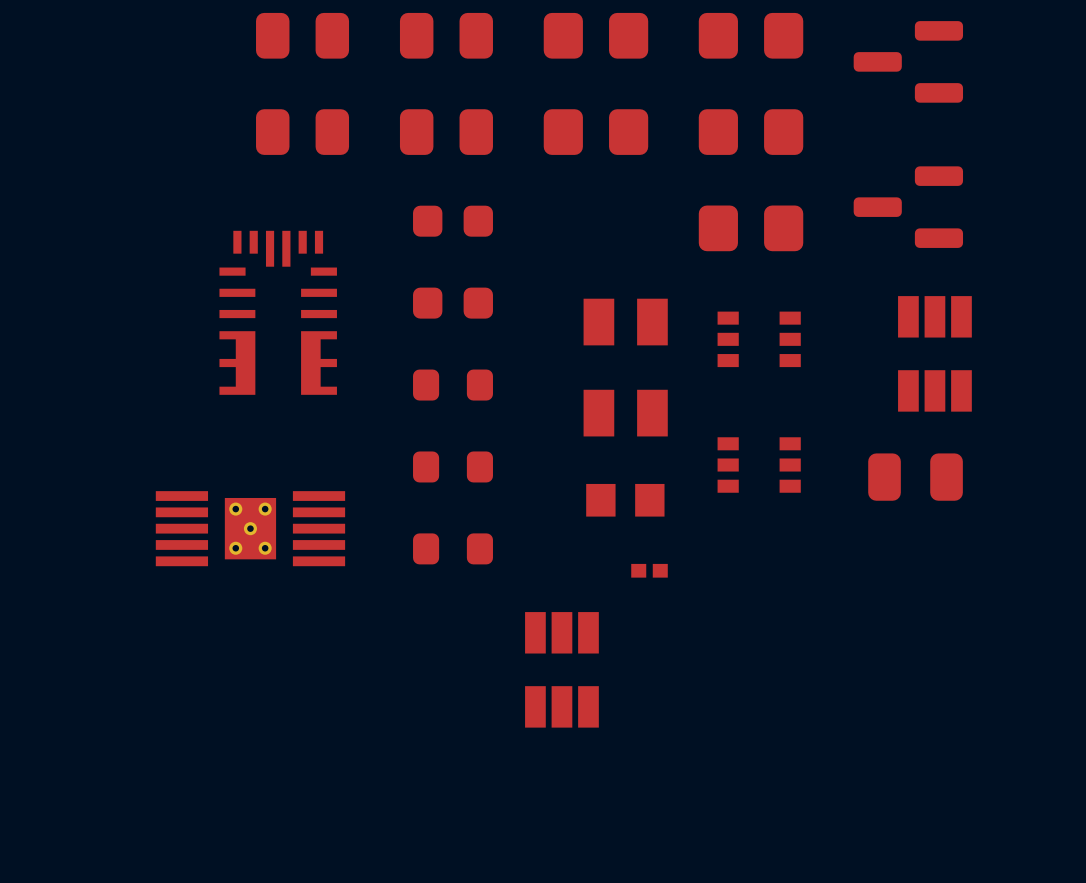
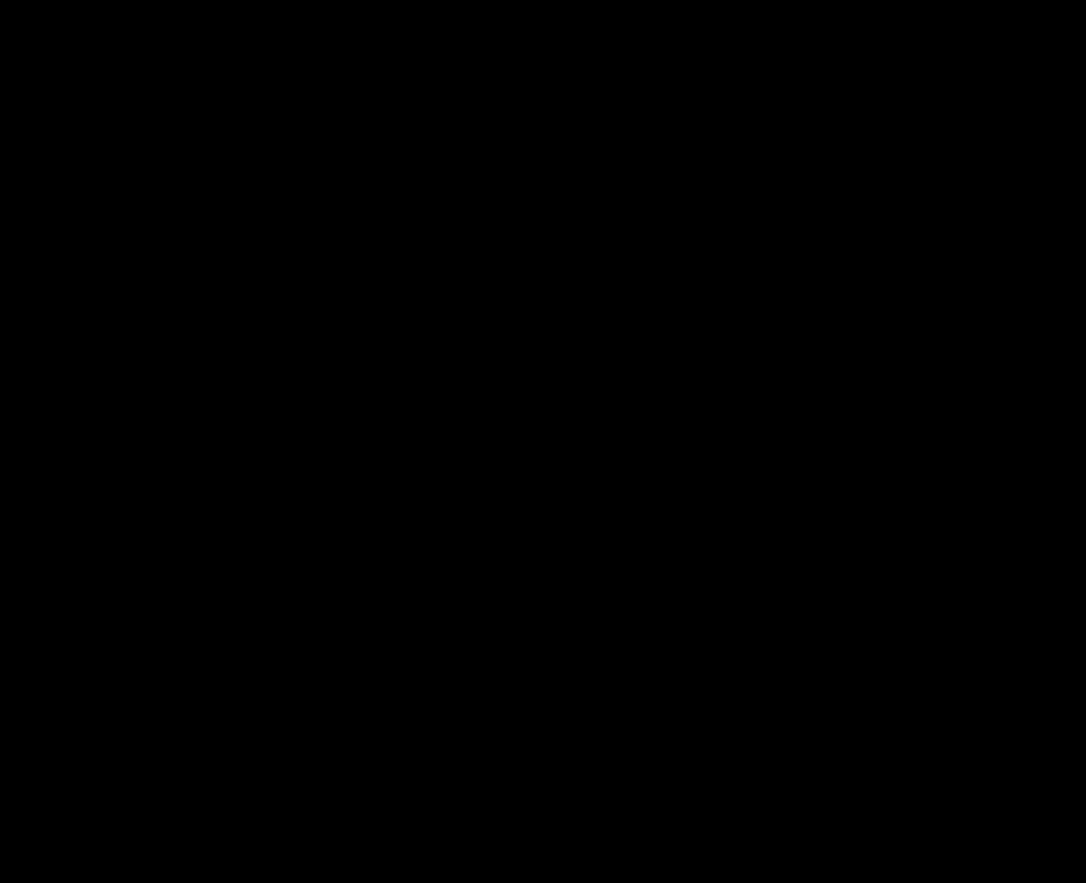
part: (302, 35) -> none
part: (446, 35) -> none
part: (595, 35) -> none
part: (751, 35) -> none
part: (908, 61) -> none
part: (302, 132) -> none
part: (446, 132) -> none
part: (595, 132) -> none
part: (751, 132) -> none
part: (908, 207) -> none
part: (453, 221) -> none
part: (751, 228) -> none
part: (453, 303) -> none
part: (278, 312) -> none
part: (934, 316) -> none
part: (625, 322) -> none
part: (759, 339) -> none
part: (453, 385) -> none
part: (934, 390) -> none
part: (625, 413) -> none
part: (759, 465) -> none
part: (453, 466) -> none
part: (915, 477) -> none
part: (625, 500) -> none
part: (250, 528) -> none
part: (453, 548) -> none
part: (649, 570) -> none
part: (561, 632) -> none
part: (561, 706) -> none

